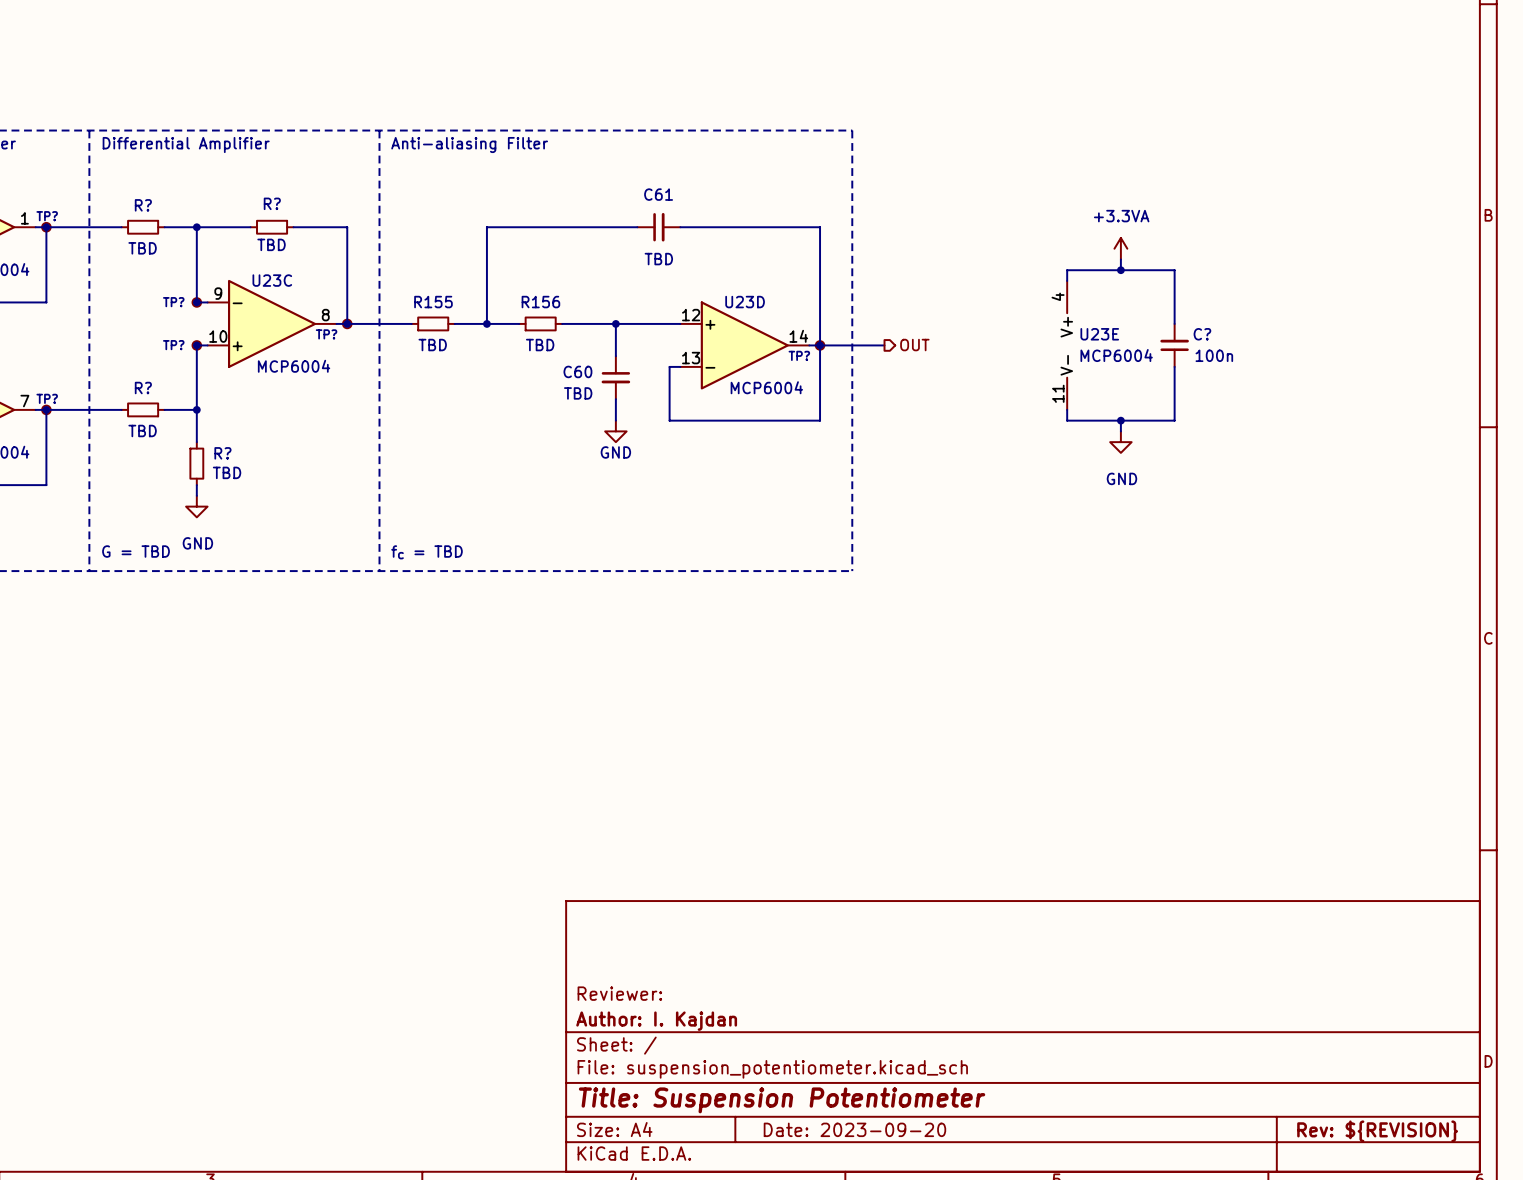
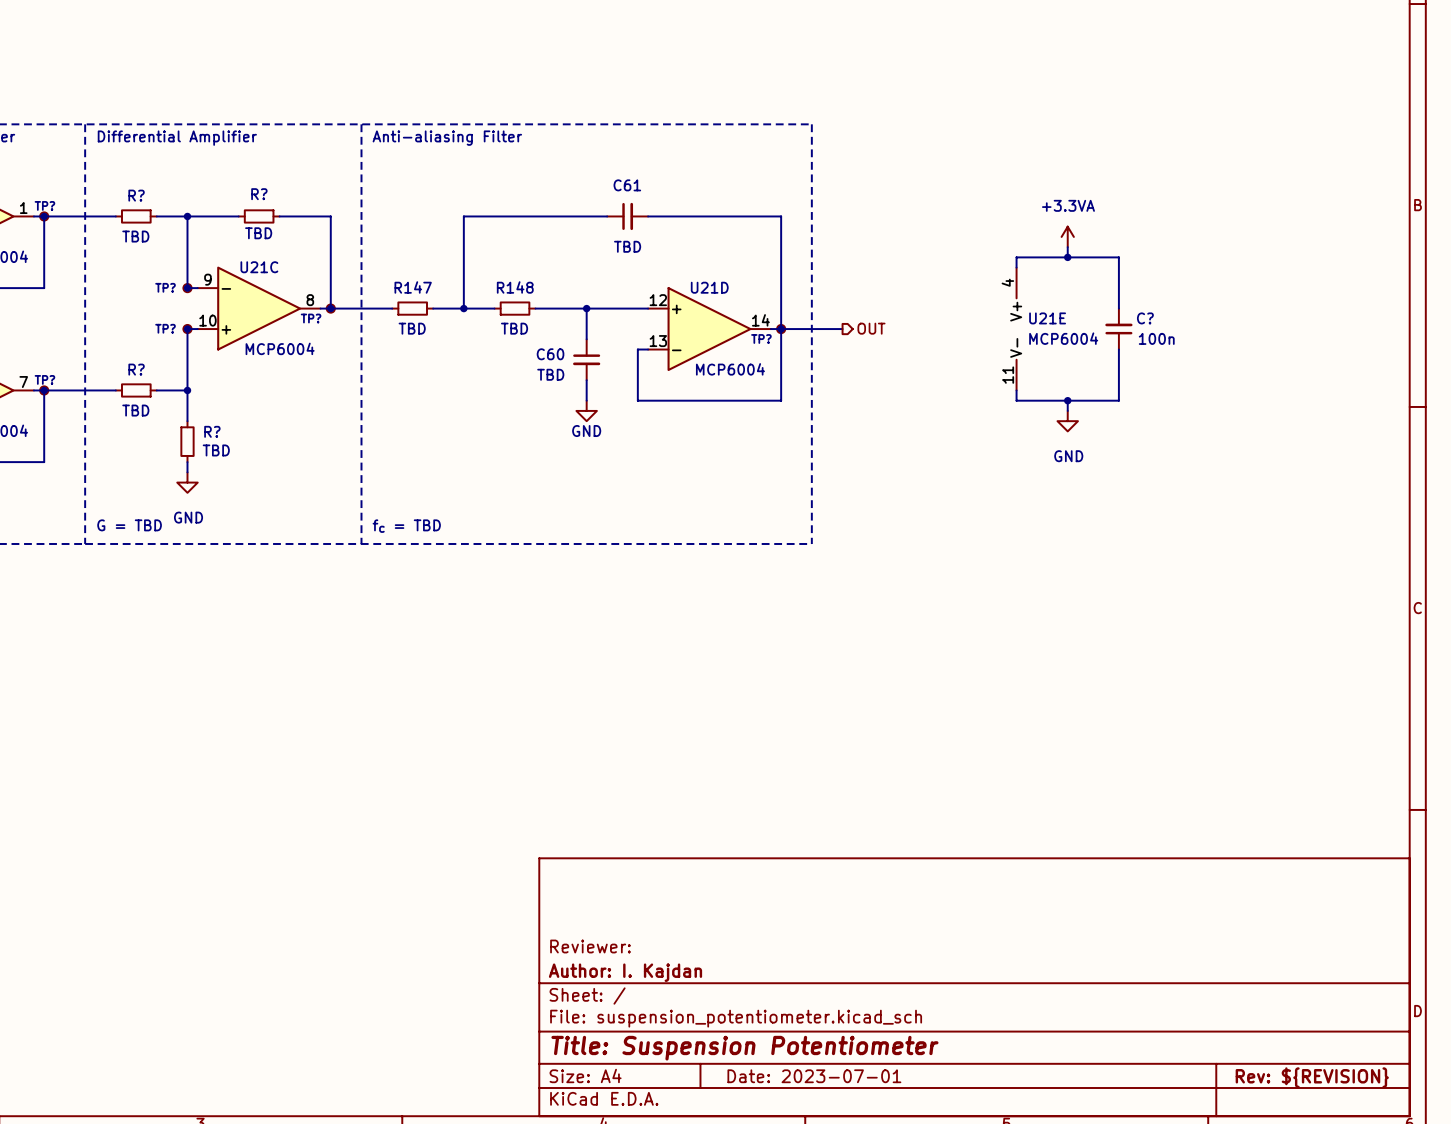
U23C name: U23C (272, 280) -> U21C (259, 267)
R155 name: R155 (433, 302) -> R147 (413, 287)
R156 name: R156 (540, 302) -> R148 (515, 287)
U23D name: U23D (745, 302) -> U21D (709, 287)
U23E name: U23E (1099, 334) -> U21E (1047, 318)
title block: Date: 2023-09-20 (854, 1129) -> Date: 2023-07-01 (814, 1076)

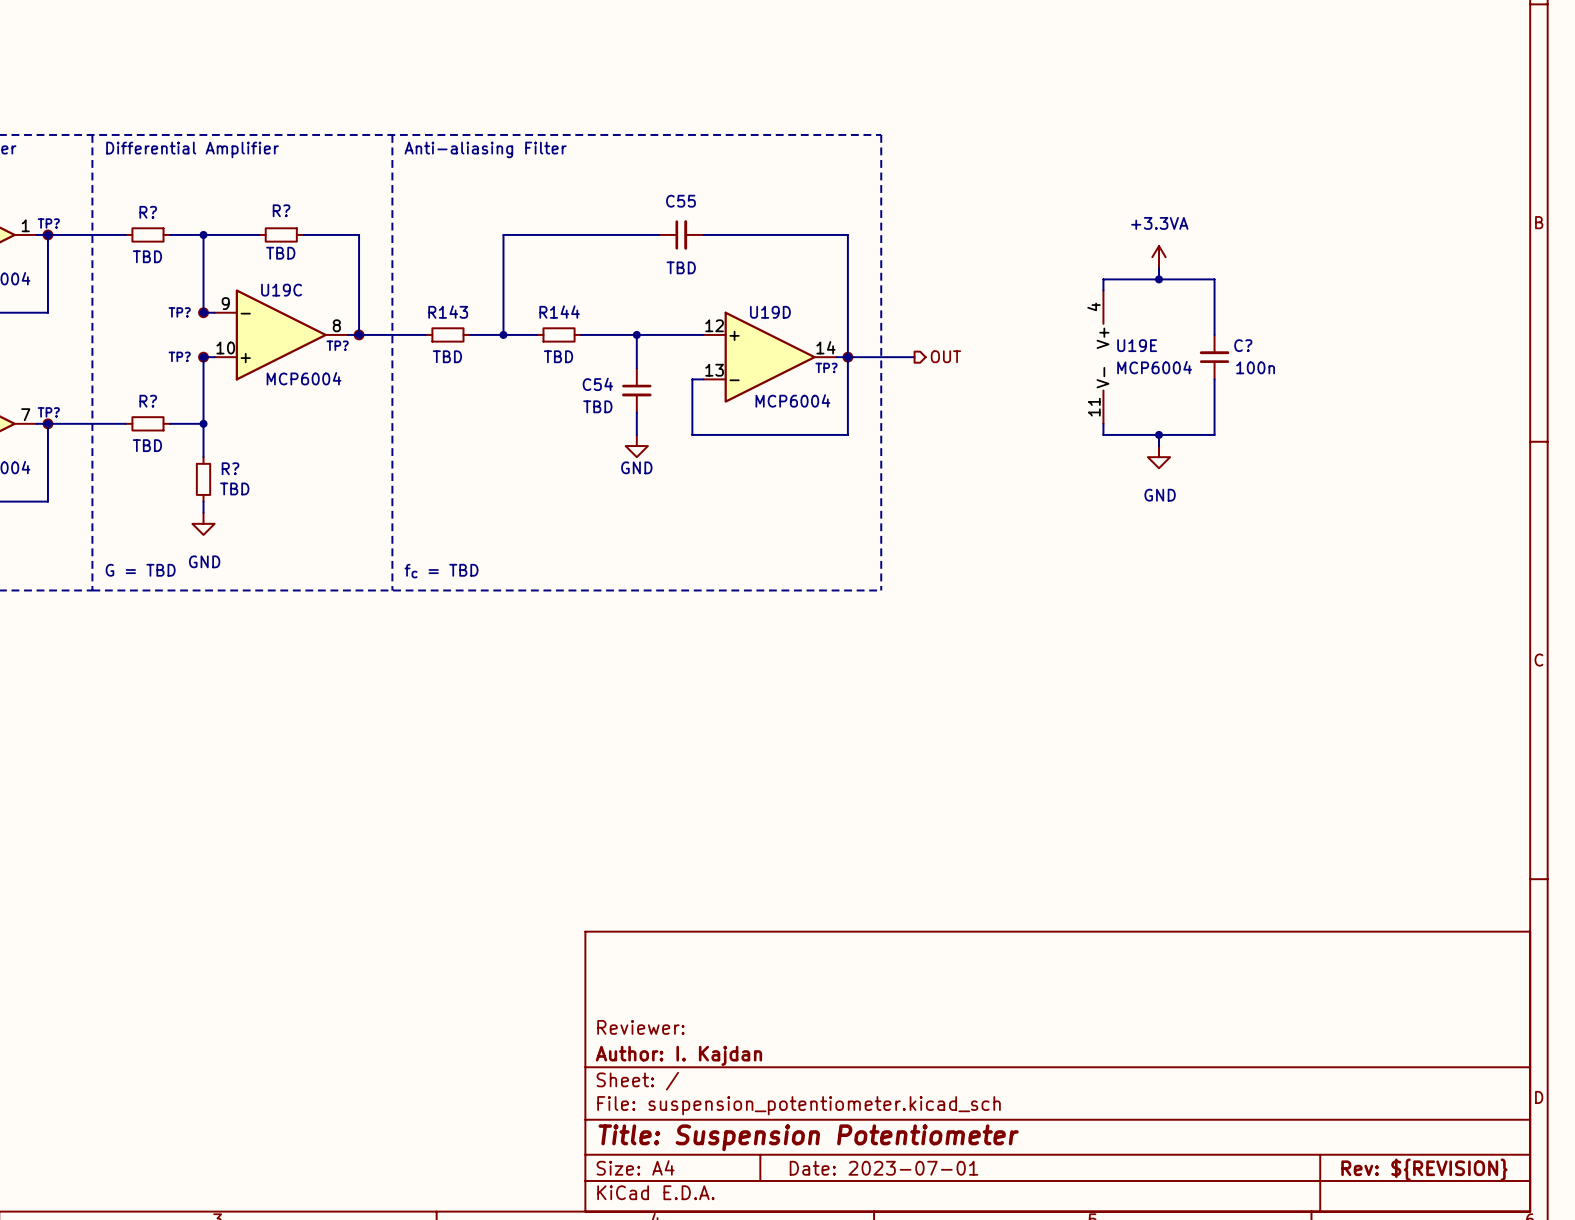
C61 name: C61 (627, 185) -> C55 (680, 201)
U21C name: U21C (259, 267) -> U19C (281, 290)
R147 name: R147 (413, 287) -> R143 (448, 312)
R148 name: R148 (515, 287) -> R144 (559, 312)
U21D name: U21D (709, 287) -> U19D (770, 312)
U21E name: U21E (1047, 318) -> U19E (1137, 345)
C60 name: C60 (550, 354) -> C54 (597, 384)

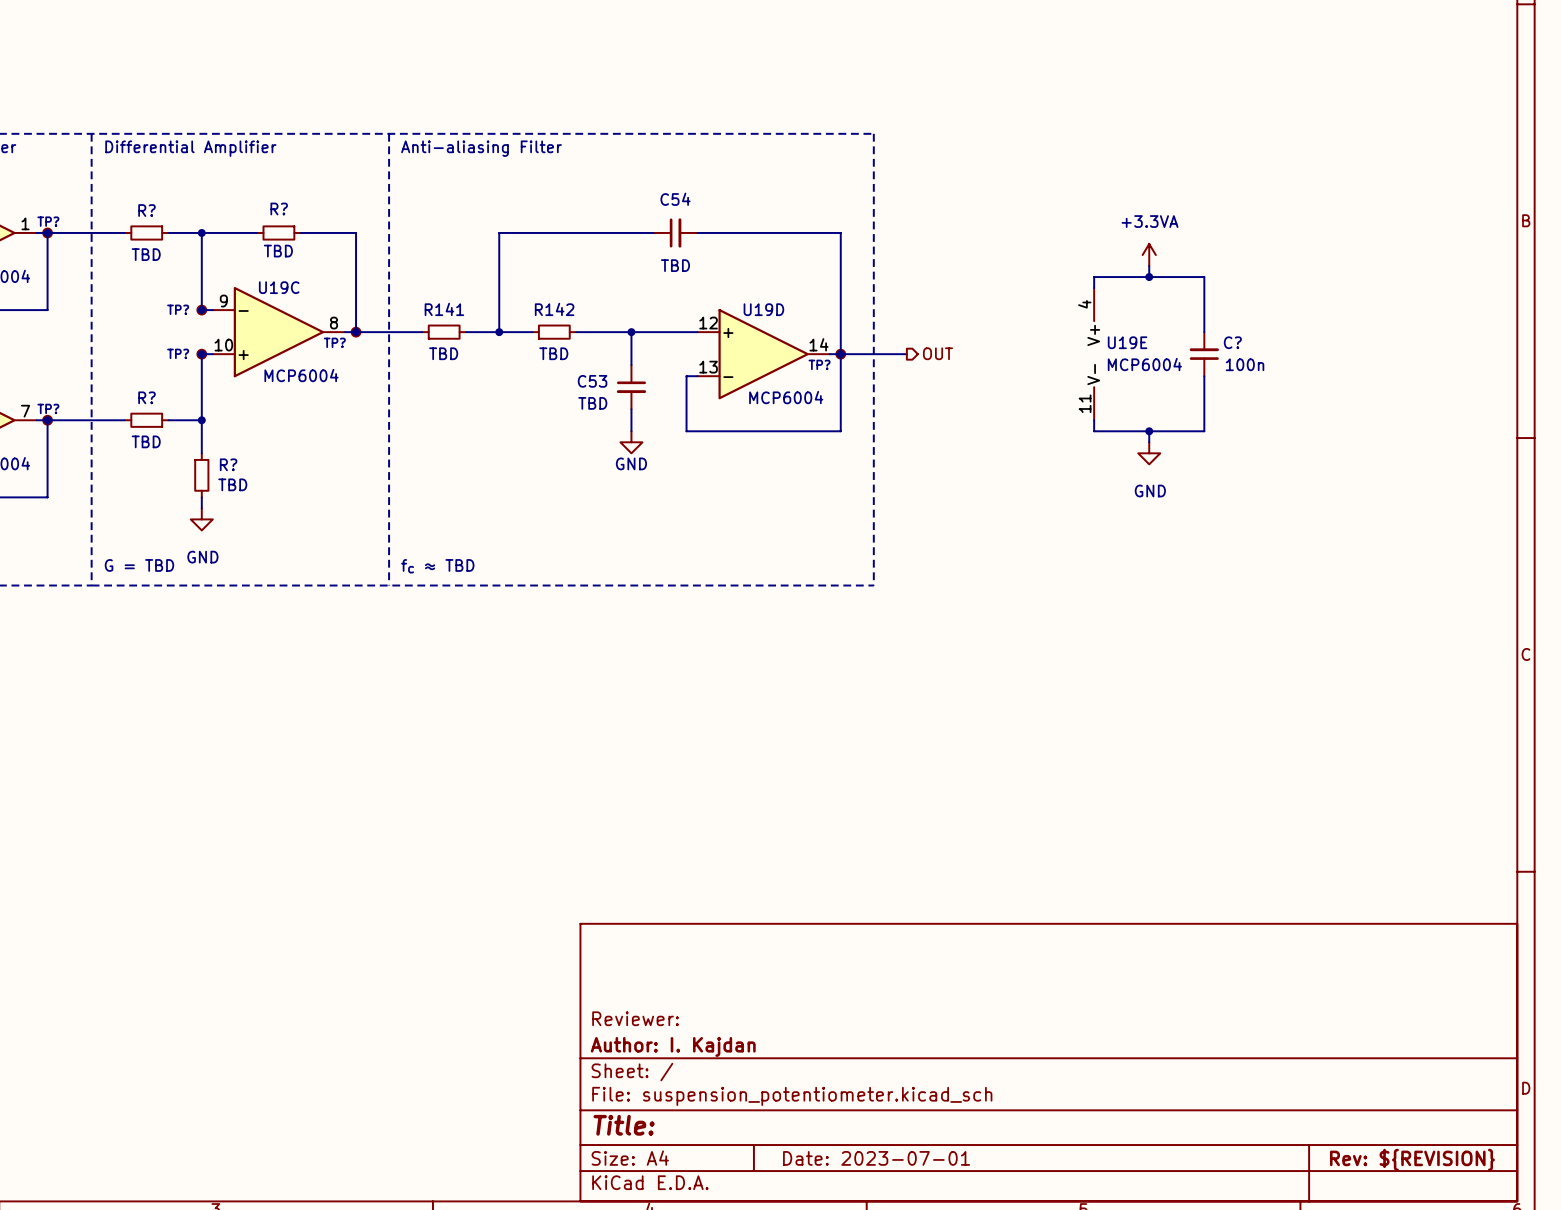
C55 name: C55 (680, 201) -> C54 (675, 199)
R143 name: R143 (448, 312) -> R141 (444, 309)
R144 name: R144 (559, 312) -> R142 (554, 309)
C54 name: C54 (597, 384) -> C53 (592, 381)
text: fc = TBD (441, 571) -> fc ≈ TBD (437, 566)
title block: Title: Suspension Potentiometer (808, 1137) -> Title: (624, 1125)

